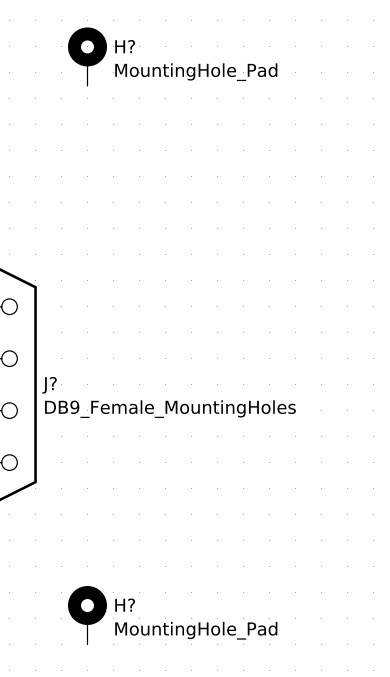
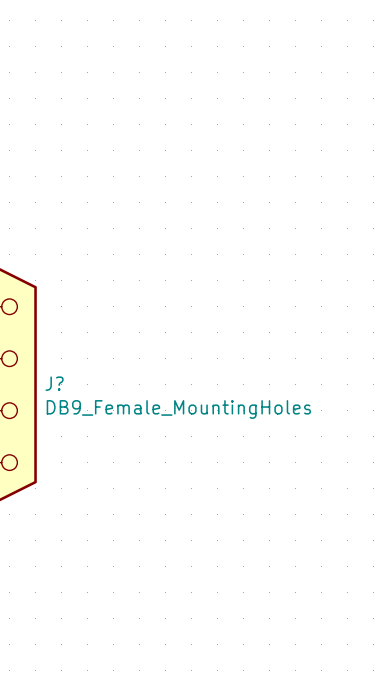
H?: MountingHole_Pad (87, 56) -> none
H?: MountingHole_Pad (87, 615) -> none

